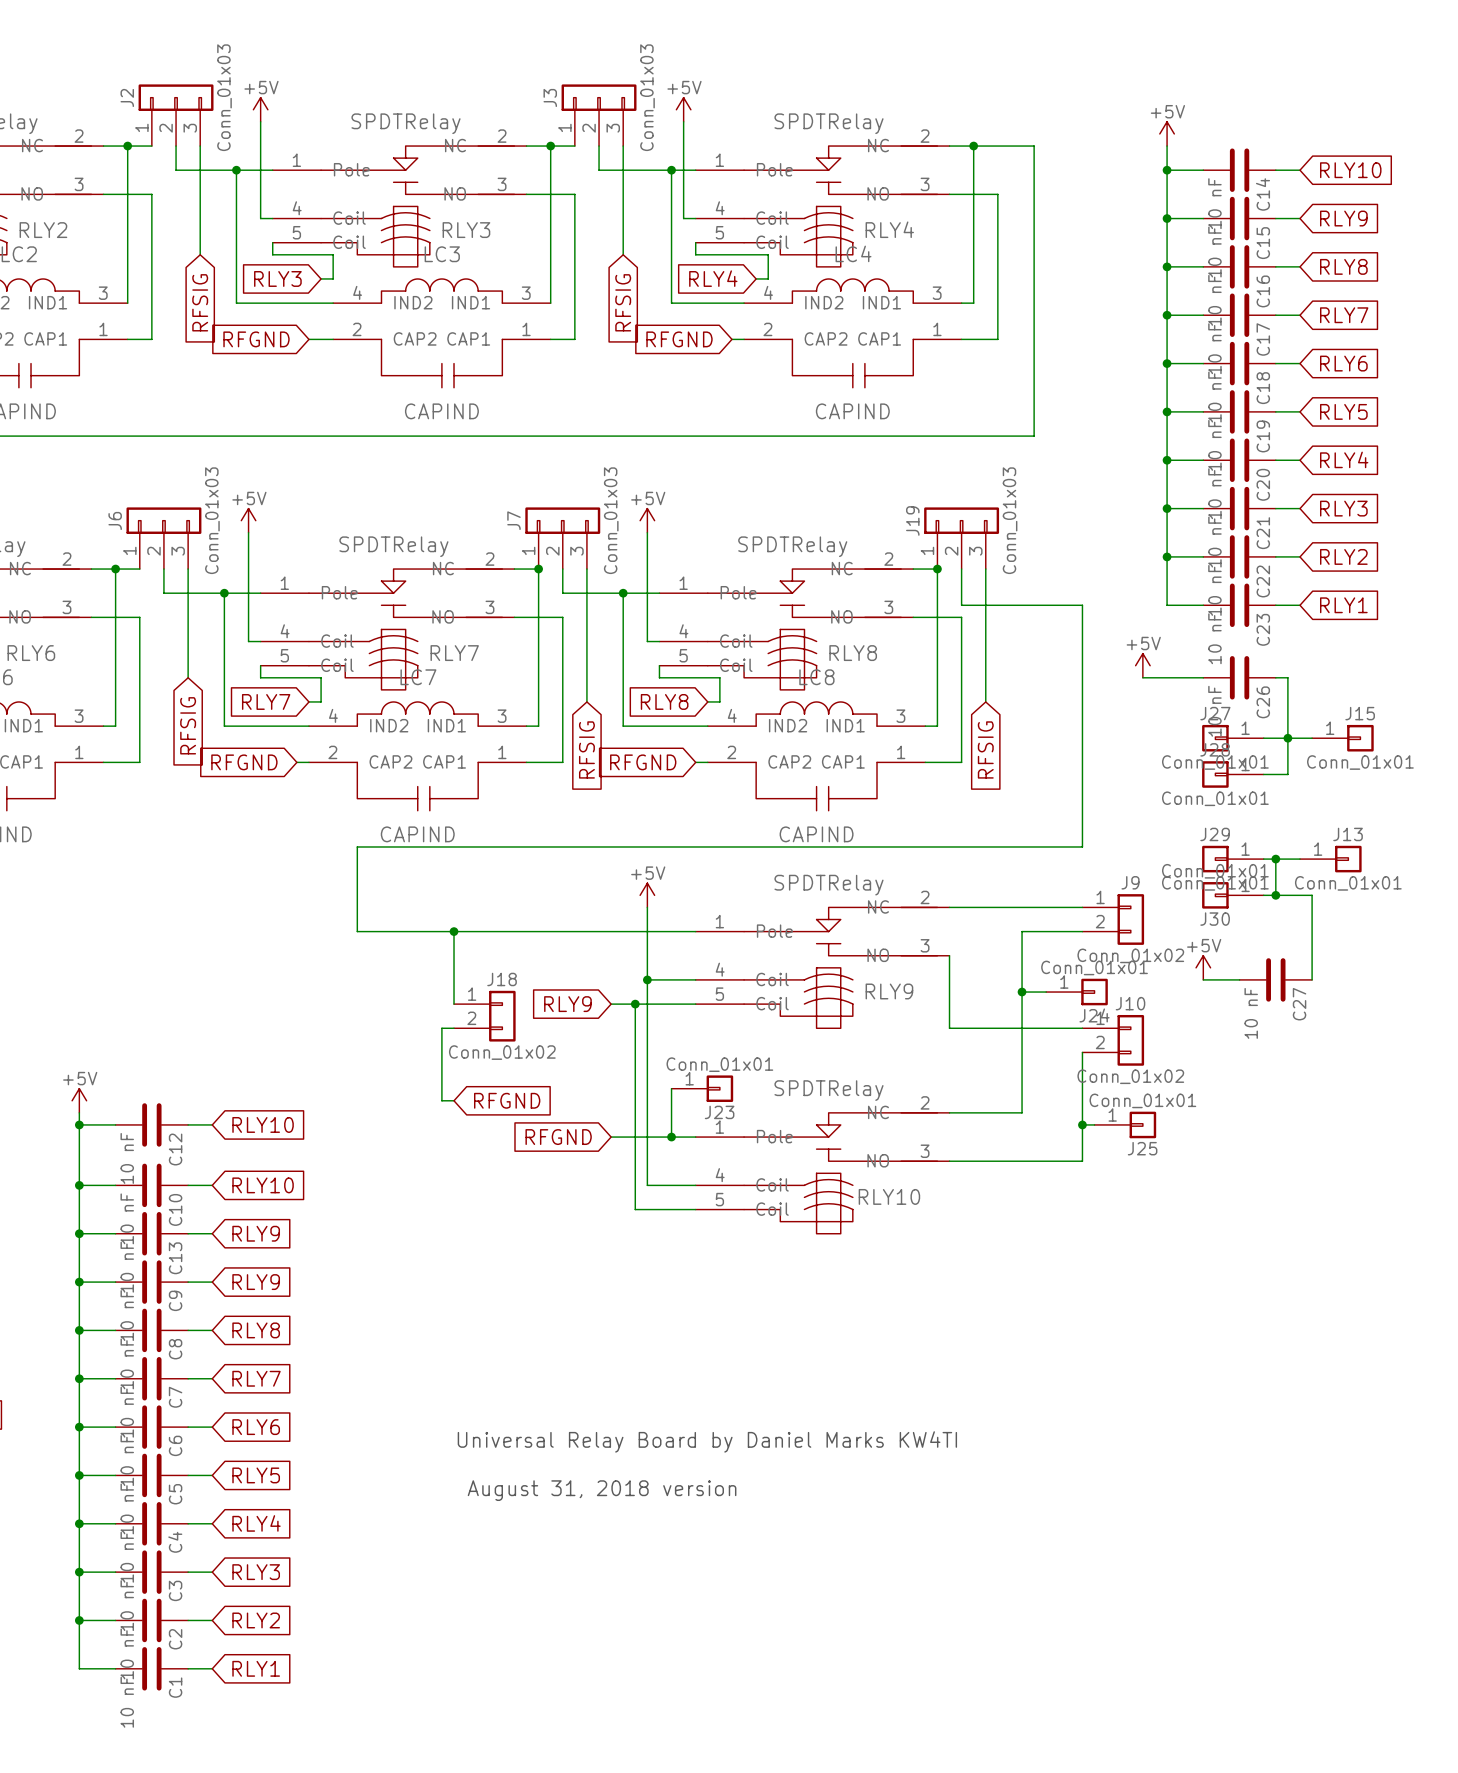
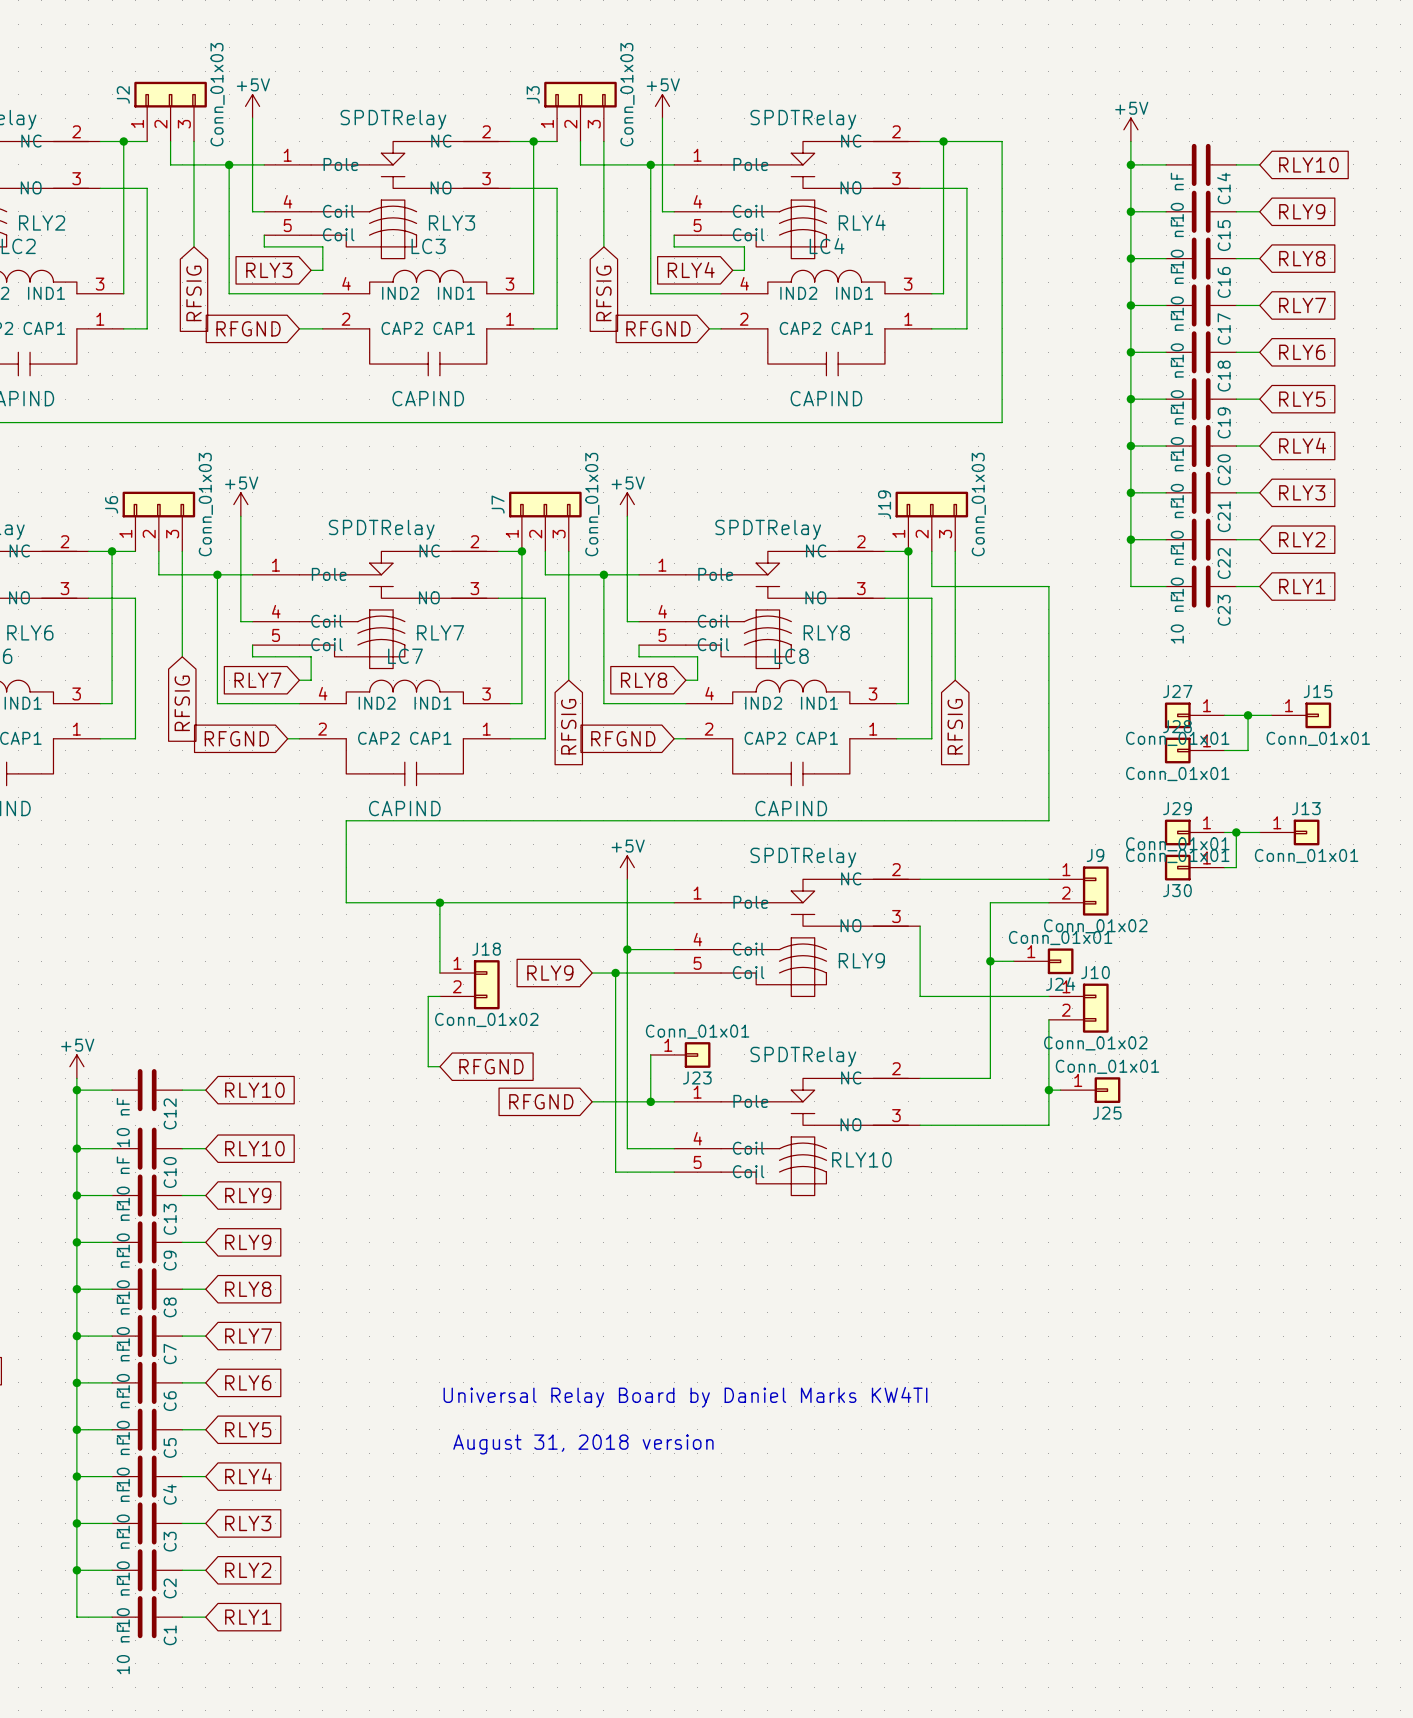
power symbol: +5V (1142, 665) -> none
wire: (1142, 677) (1203, 677) -> none
C26: 10 nF (1239, 677) -> none
wire: (1275, 677) (1287, 677) (1287, 738) -> none
wire: (1275, 895) (1312, 895) (1312, 979) -> none
junction: (1275, 895) -> none
power symbol: +5V (1203, 967) -> none
wire: (1203, 979) (1239, 979) -> none
C27: 10 nF (1275, 979) -> none

